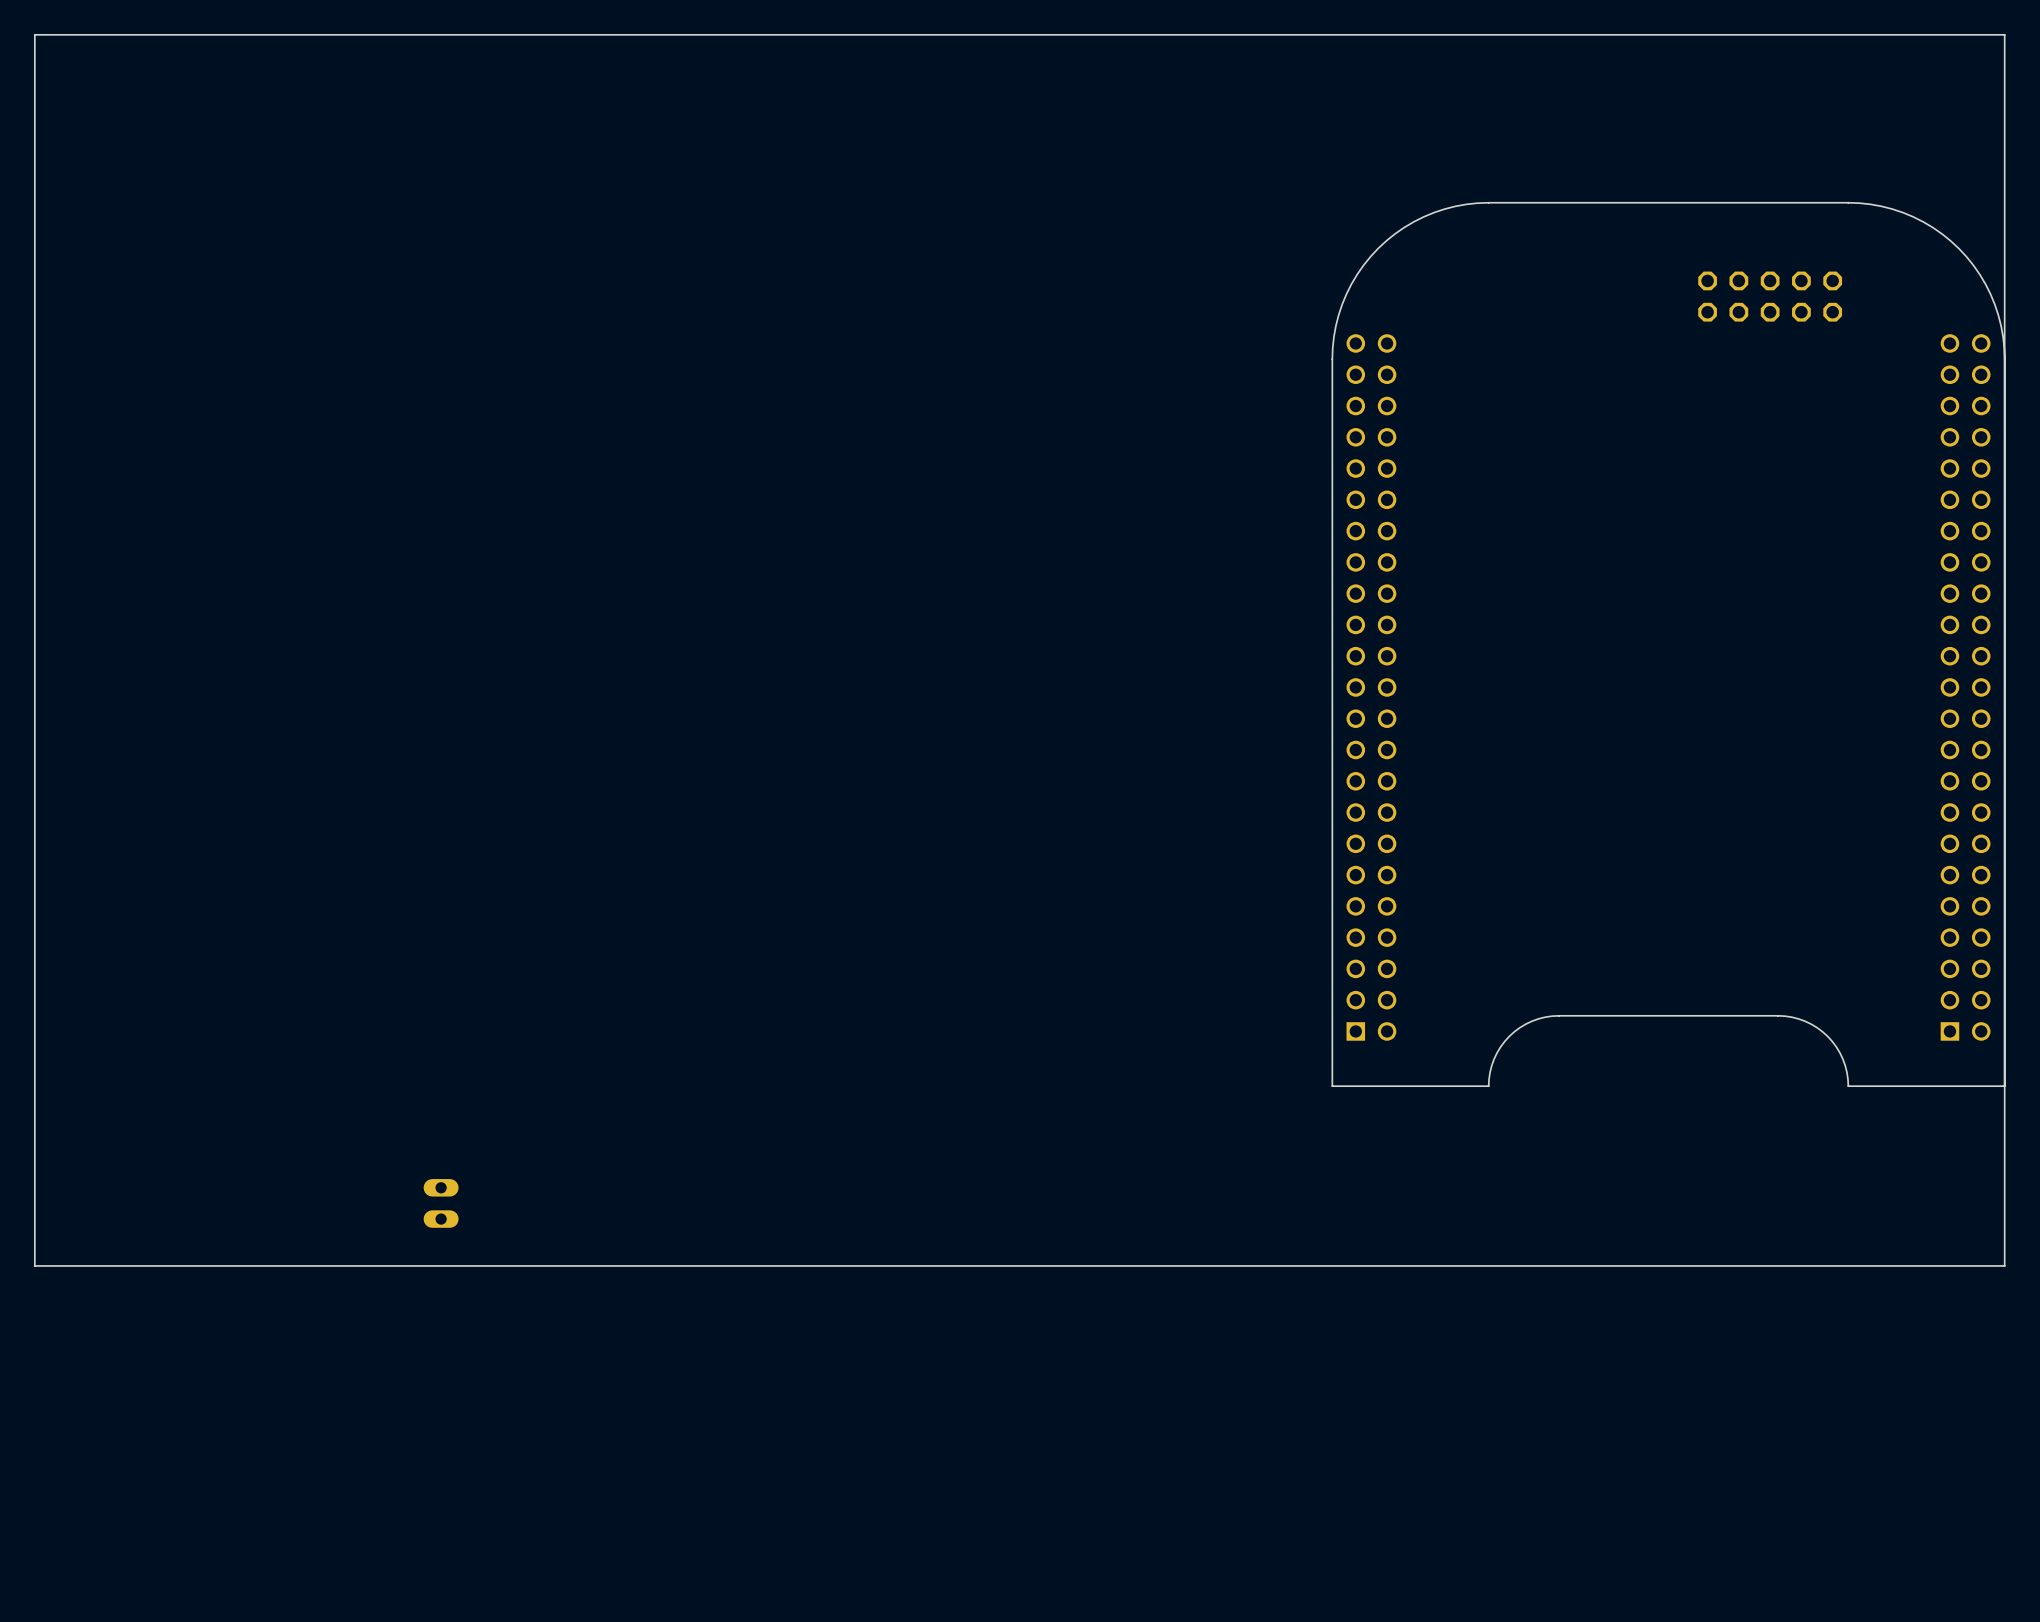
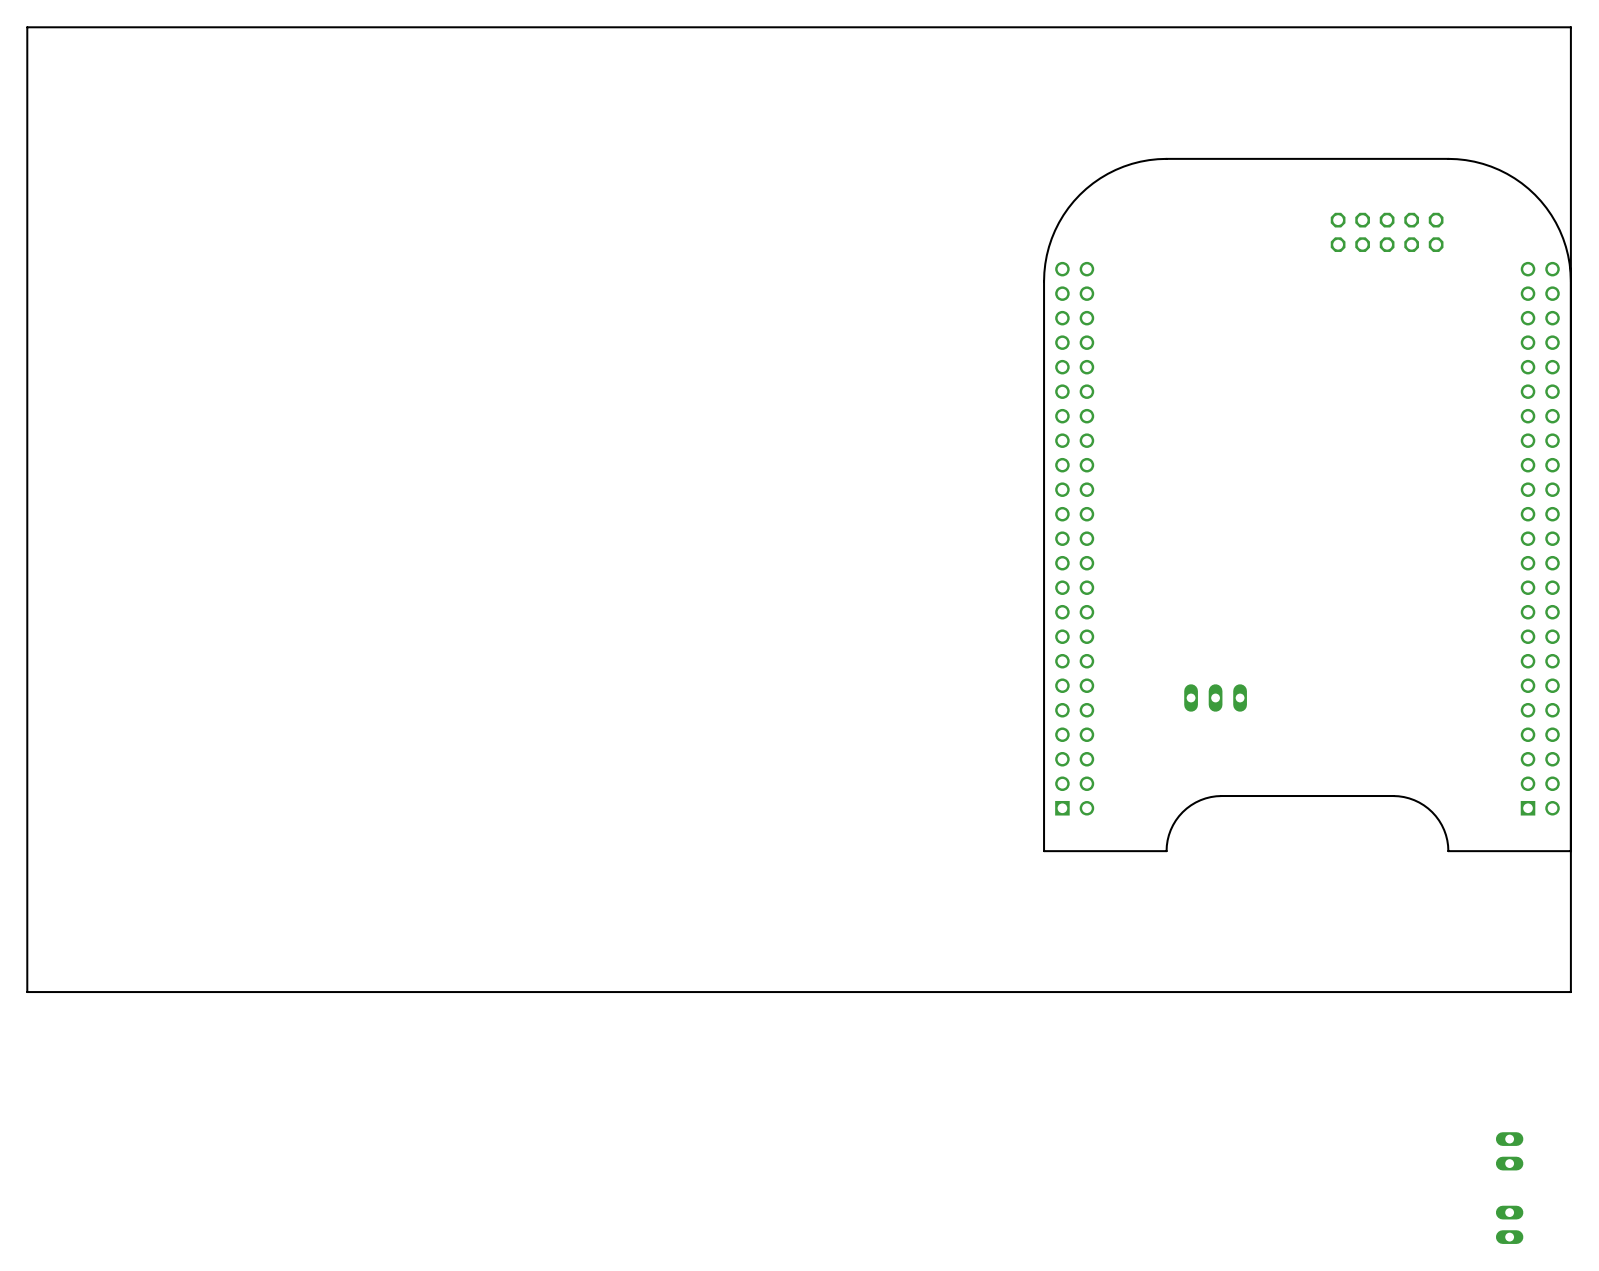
part: none -> (1215, 697)
part: (441, 1203) -> none
part: none -> (1509, 1151)
part: none -> (1509, 1224)

